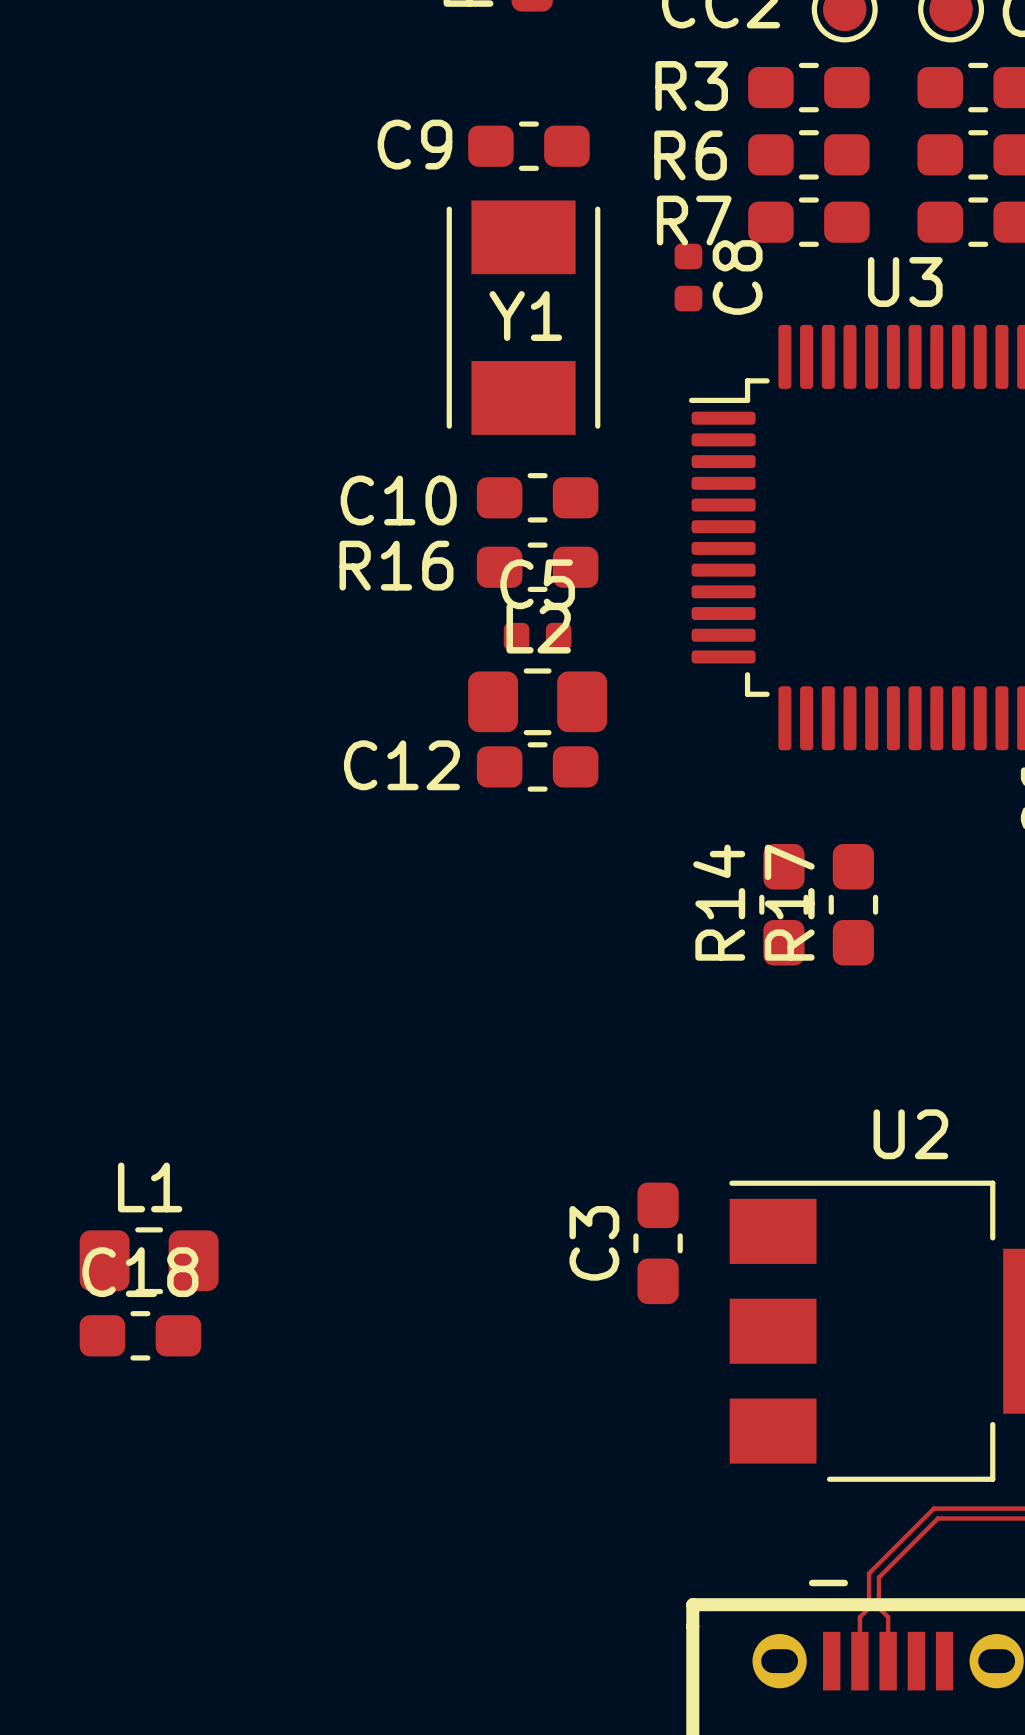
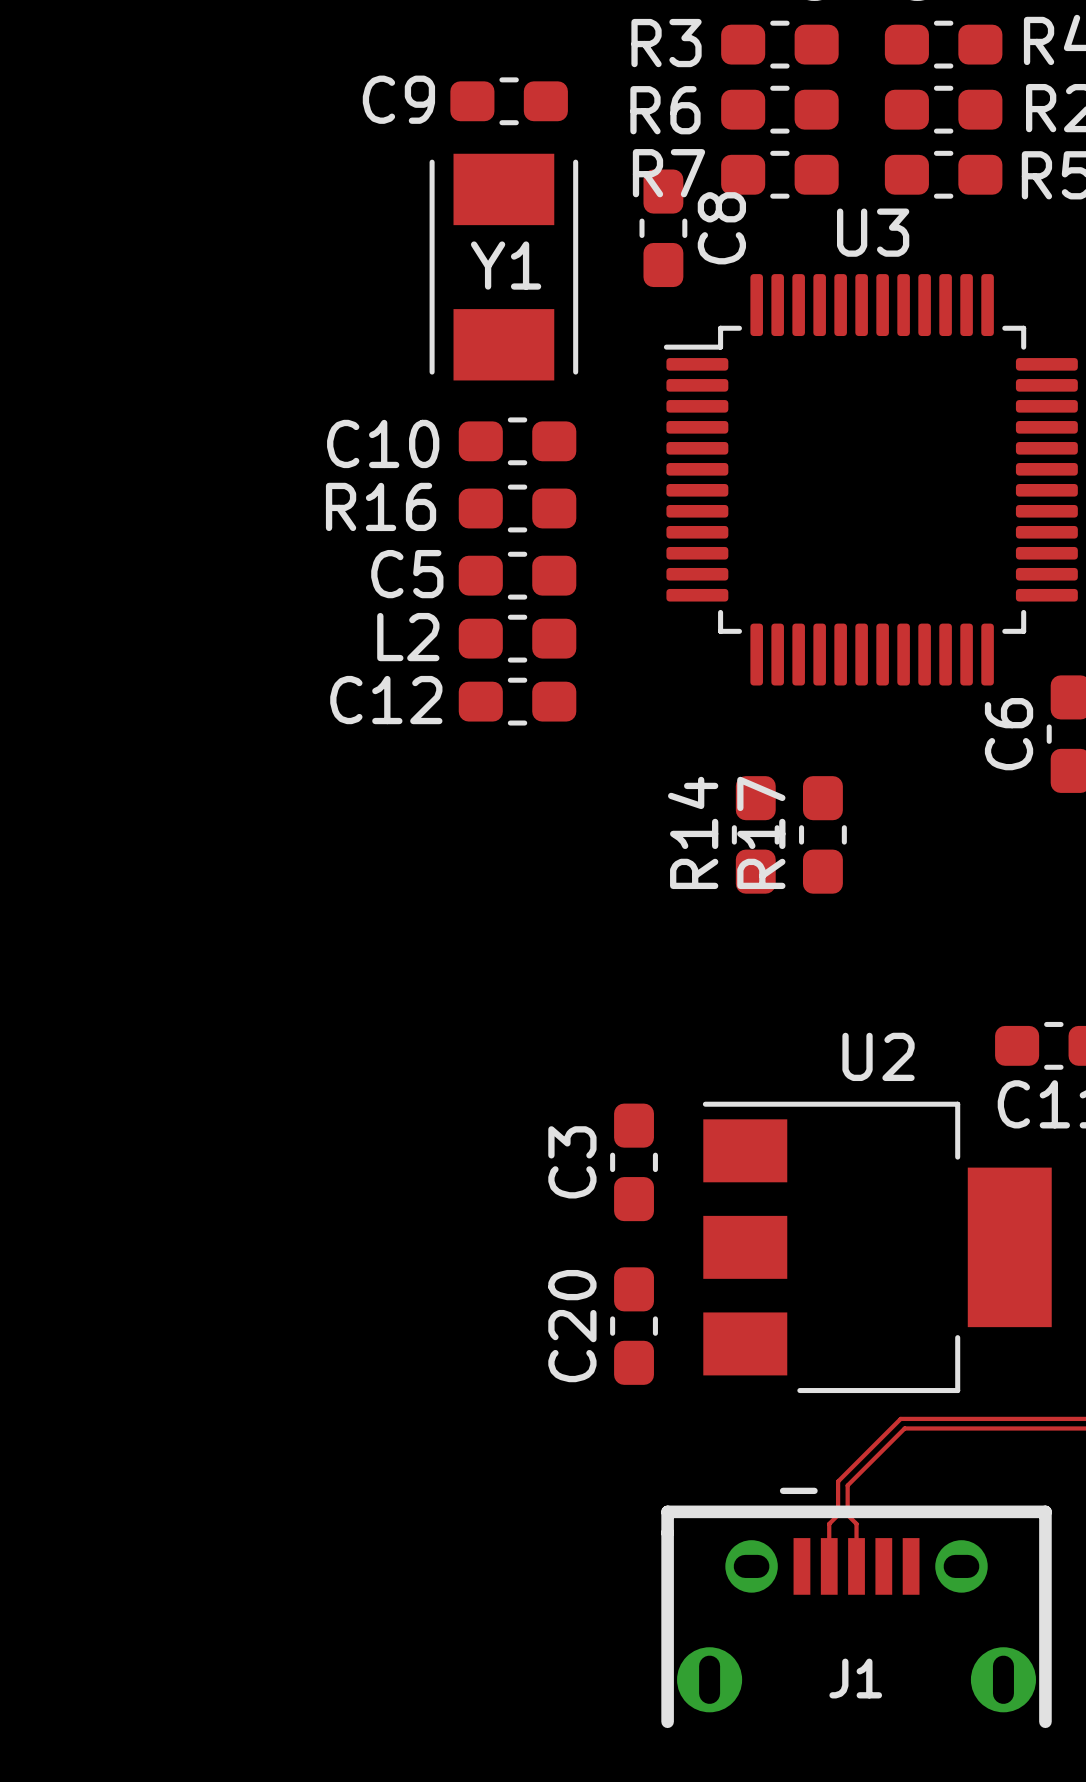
C8 footprint: [674, 243, 703, 312] -> [639, 169, 688, 288]
C5 name position: C5 (537, 584) -> C5 (407, 574)
C5 footprint: [503, 622, 572, 651] -> [458, 551, 577, 600]
L2 name position: L2 (538, 628) -> L2 (408, 637)
L2 footprint: [468, 668, 608, 736] -> [458, 614, 577, 663]
L1: (149, 1260) -> none
C18: (140, 1335) -> none
C20: none -> (634, 1326)

